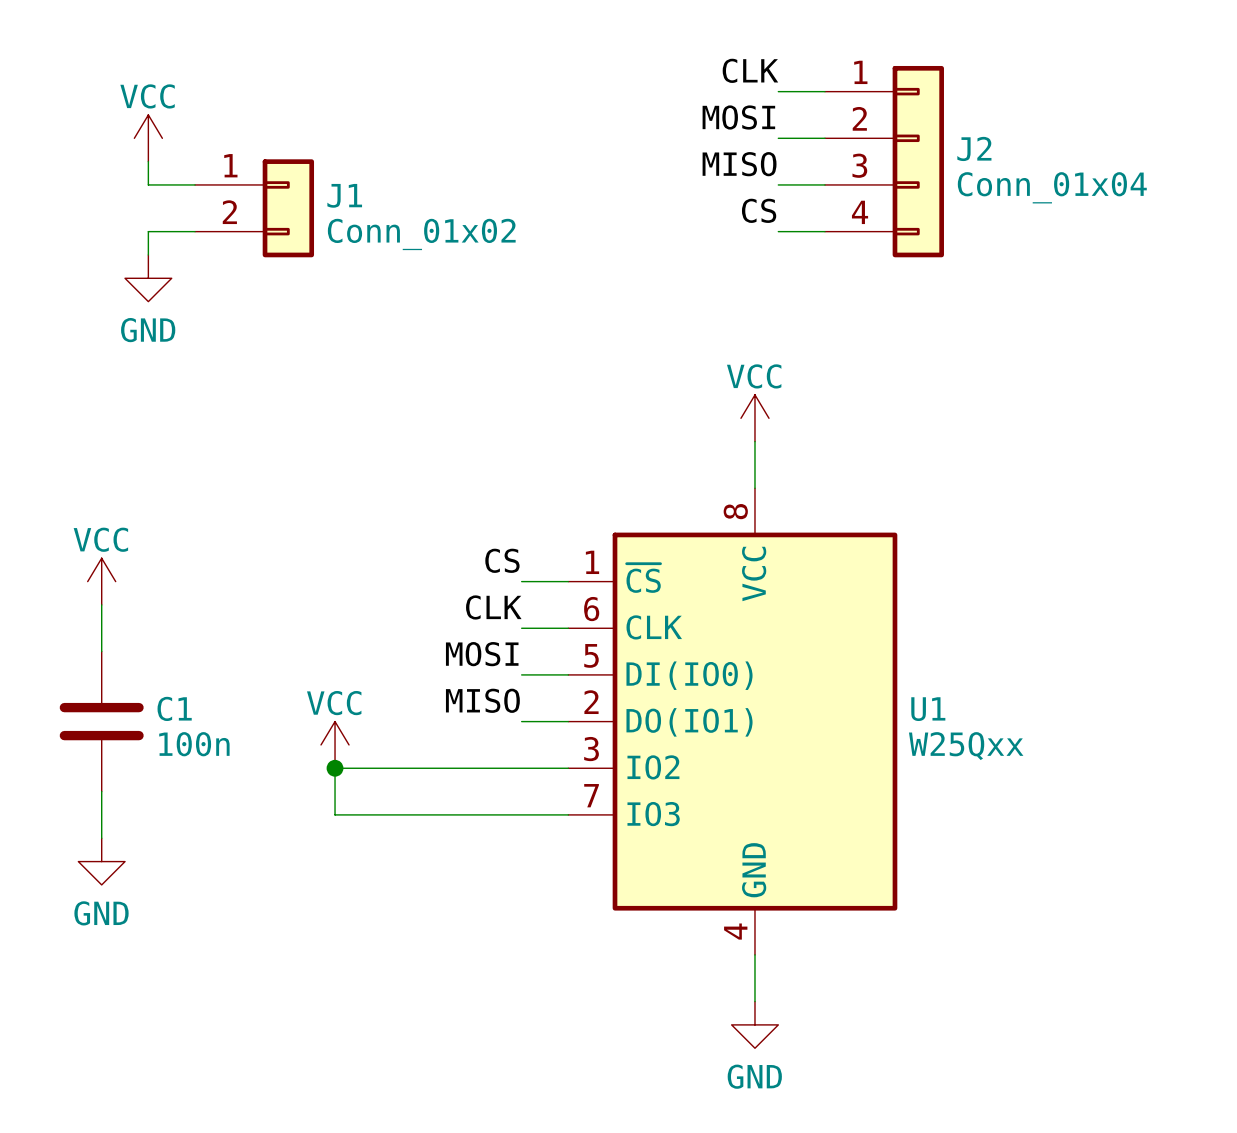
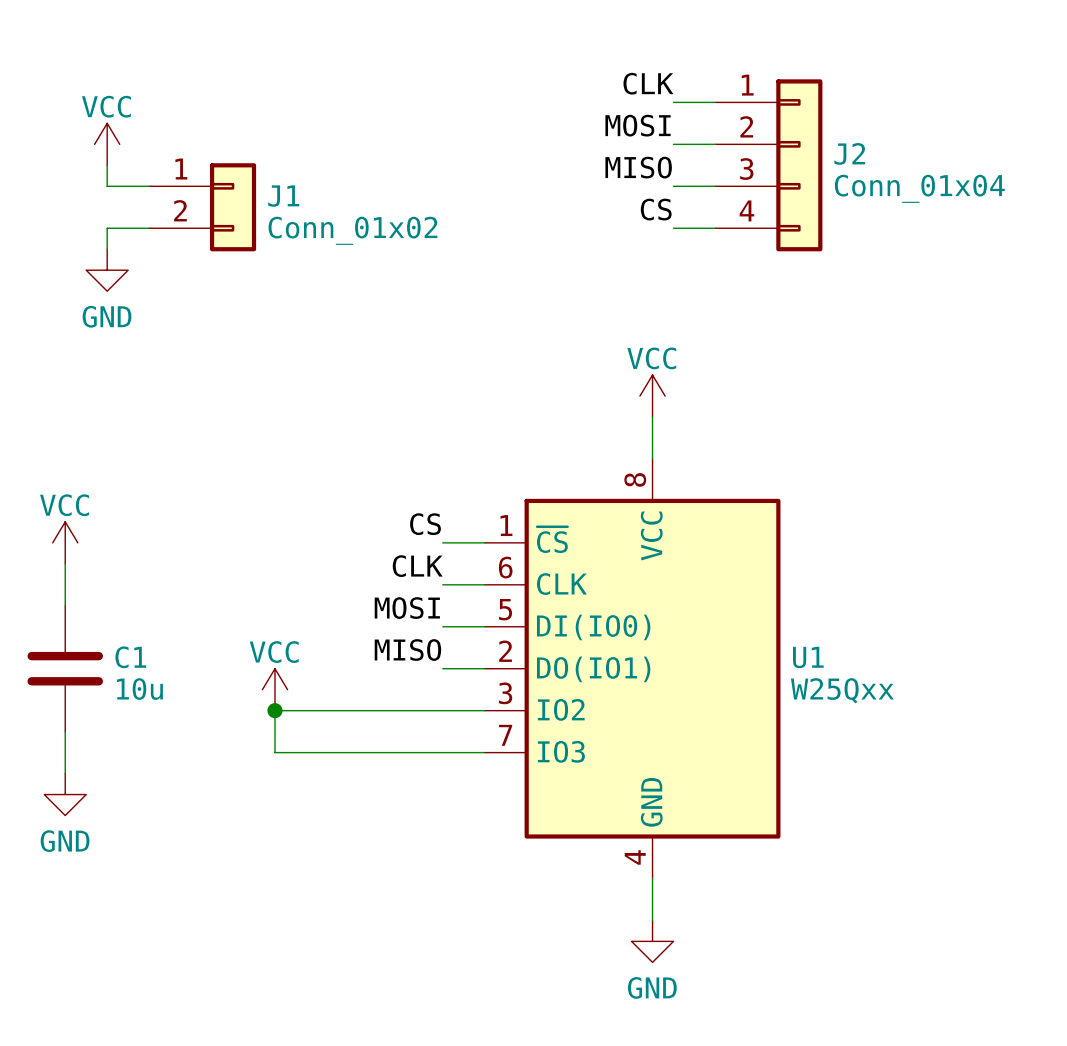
C1 value: 100n (194, 744) -> 10u (139, 689)

